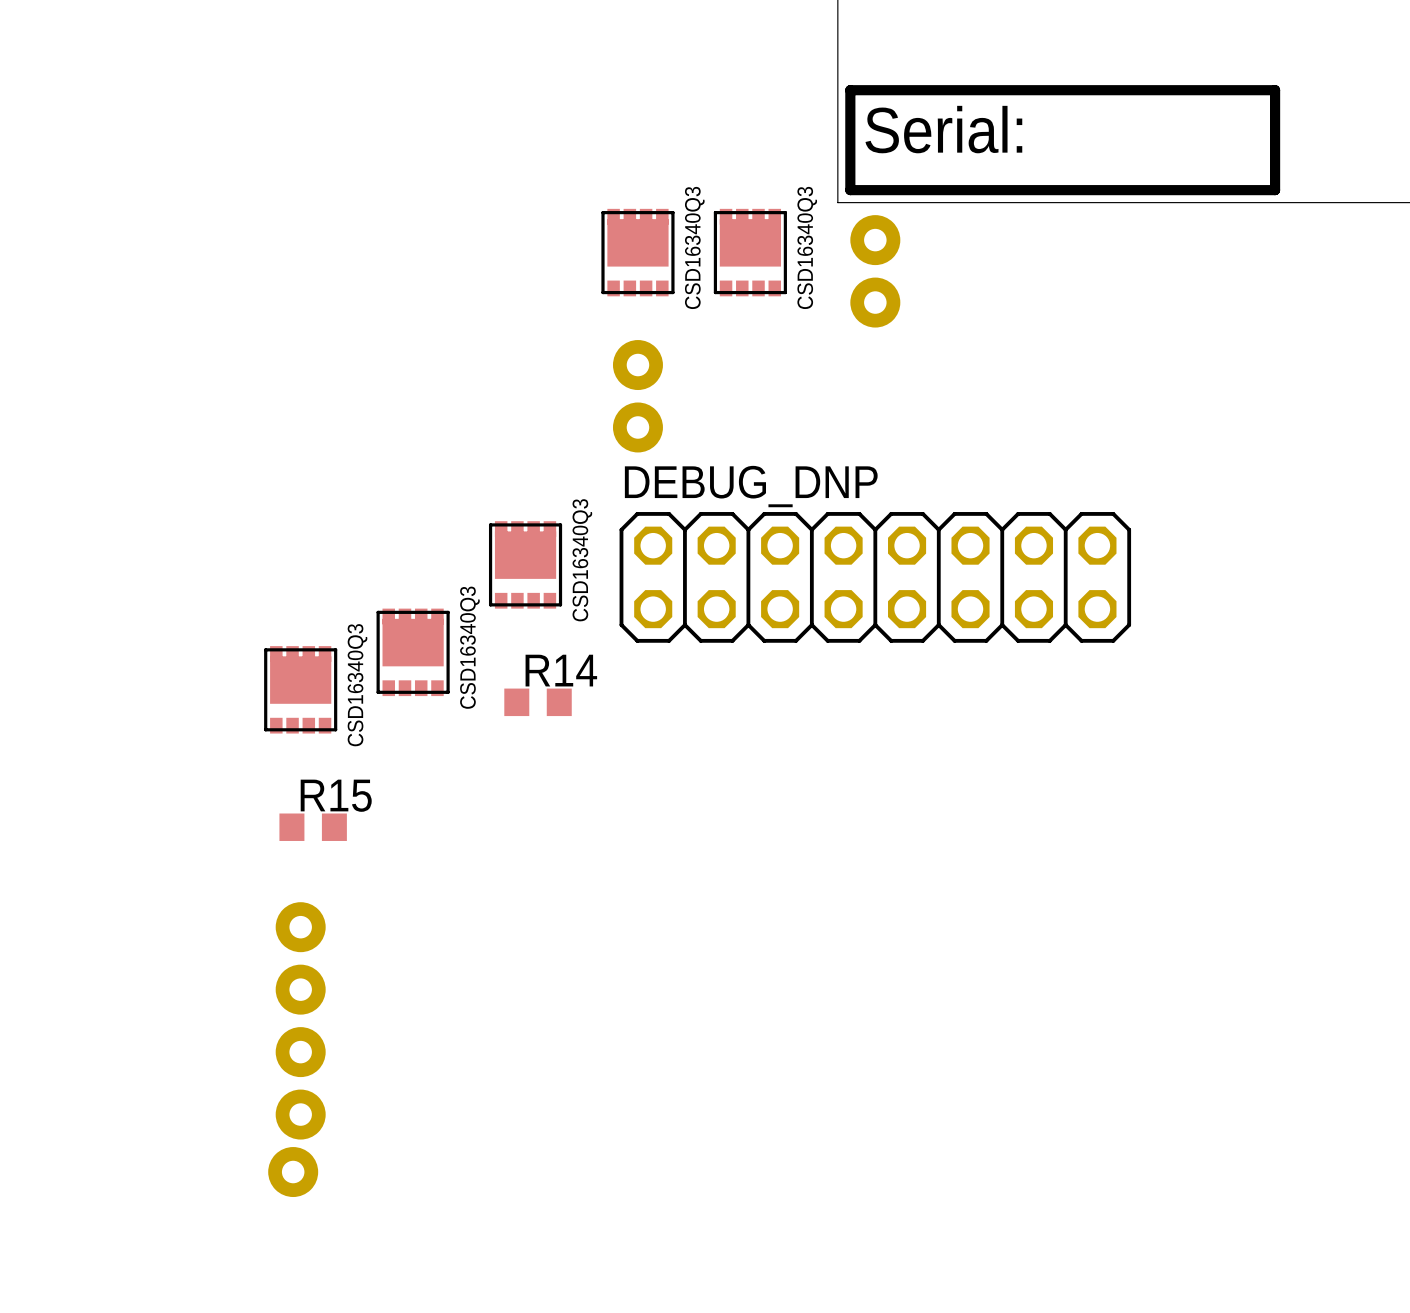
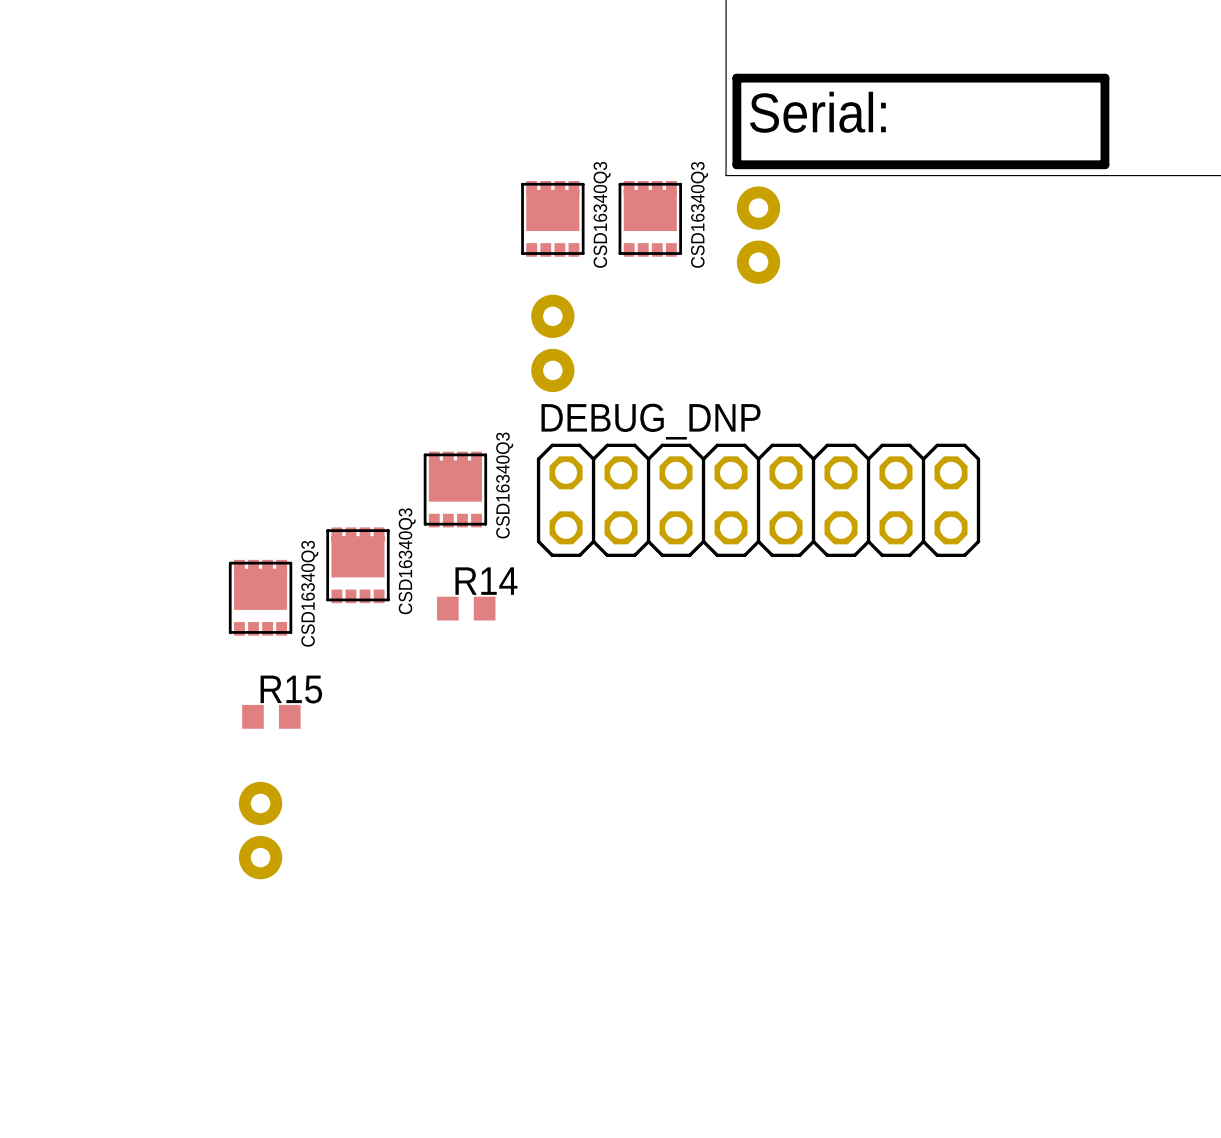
part: (300, 1052) -> none
part: (300, 1114) -> none
part: (293, 1172) -> none

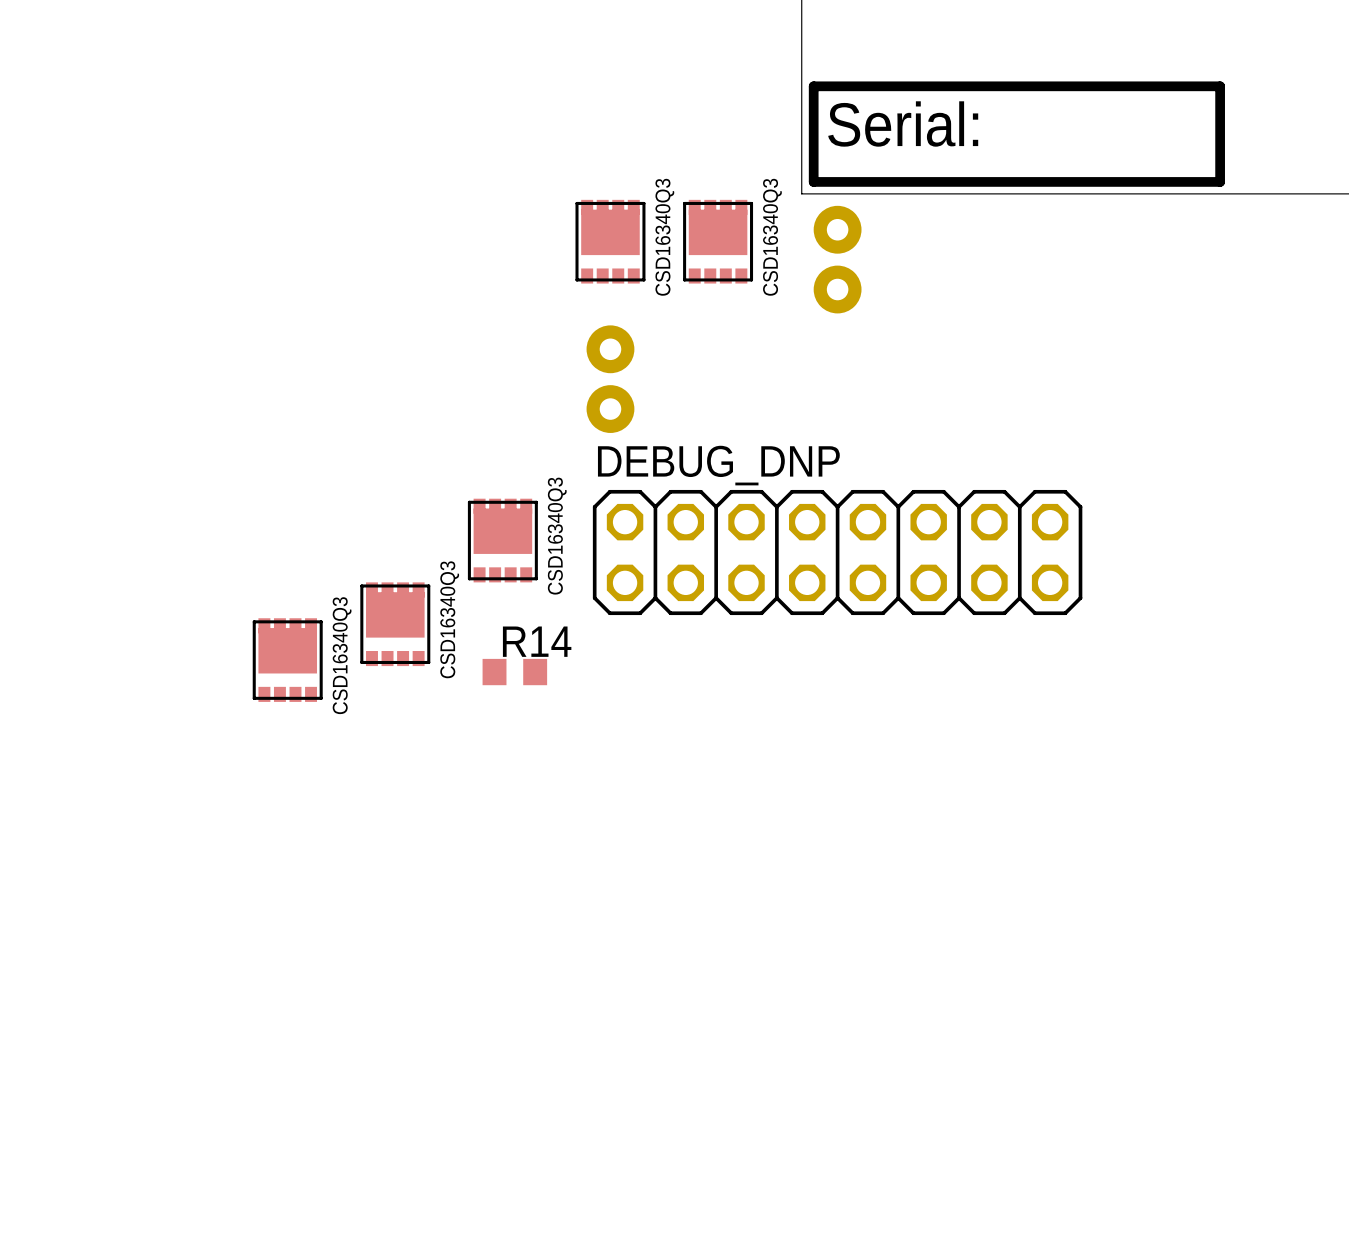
R15: (271, 716) -> none
part: (260, 803) -> none
part: (260, 857) -> none

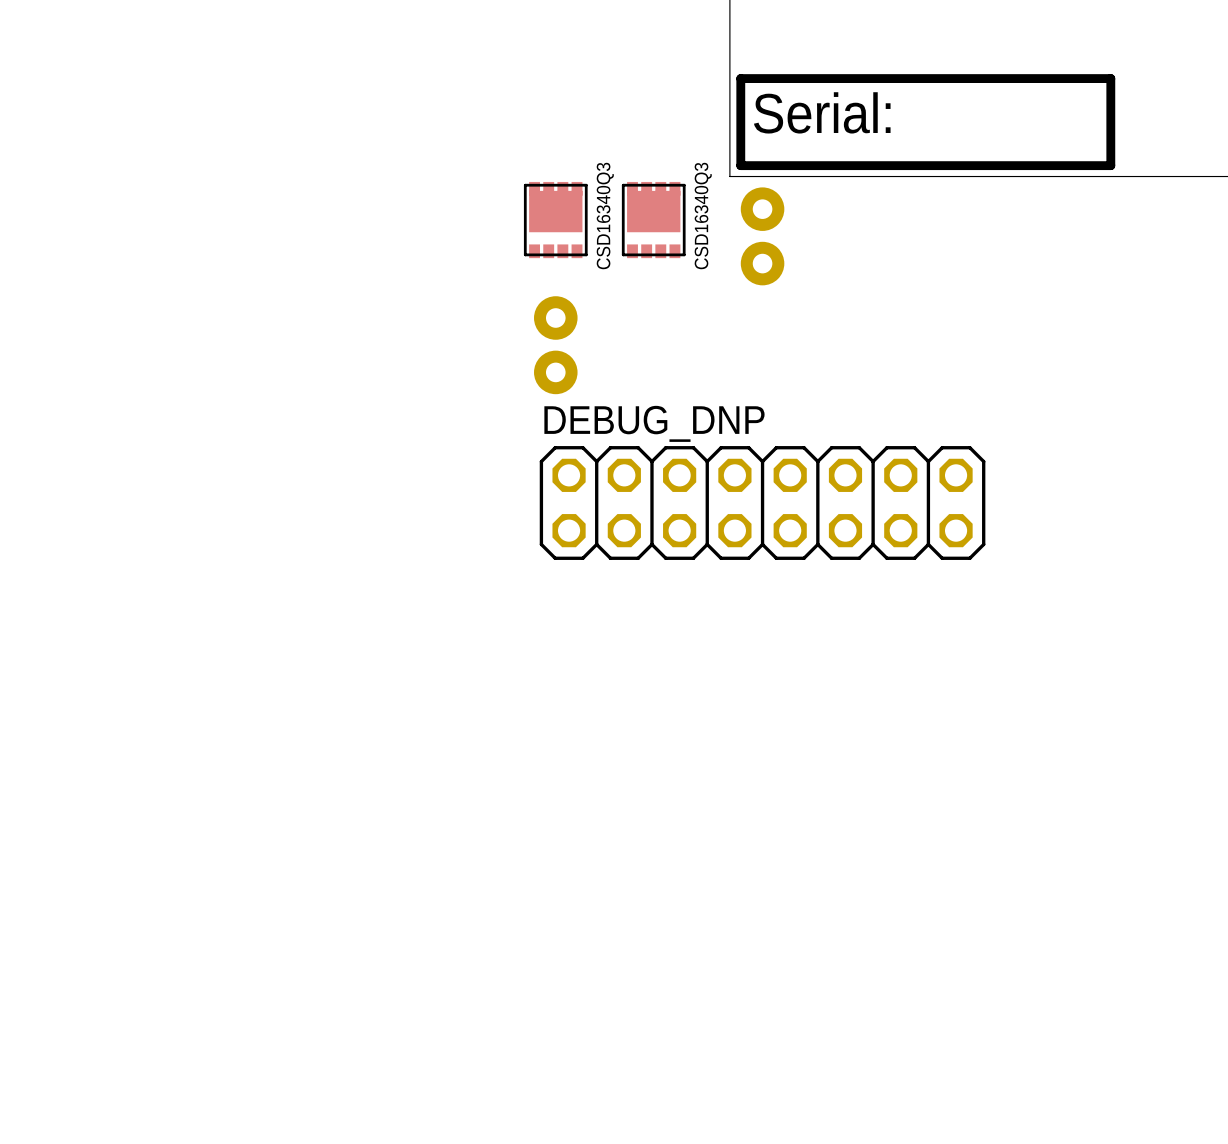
part: (502, 540) -> none
part: (395, 624) -> none
part: (287, 660) -> none
R14: (514, 672) -> none

